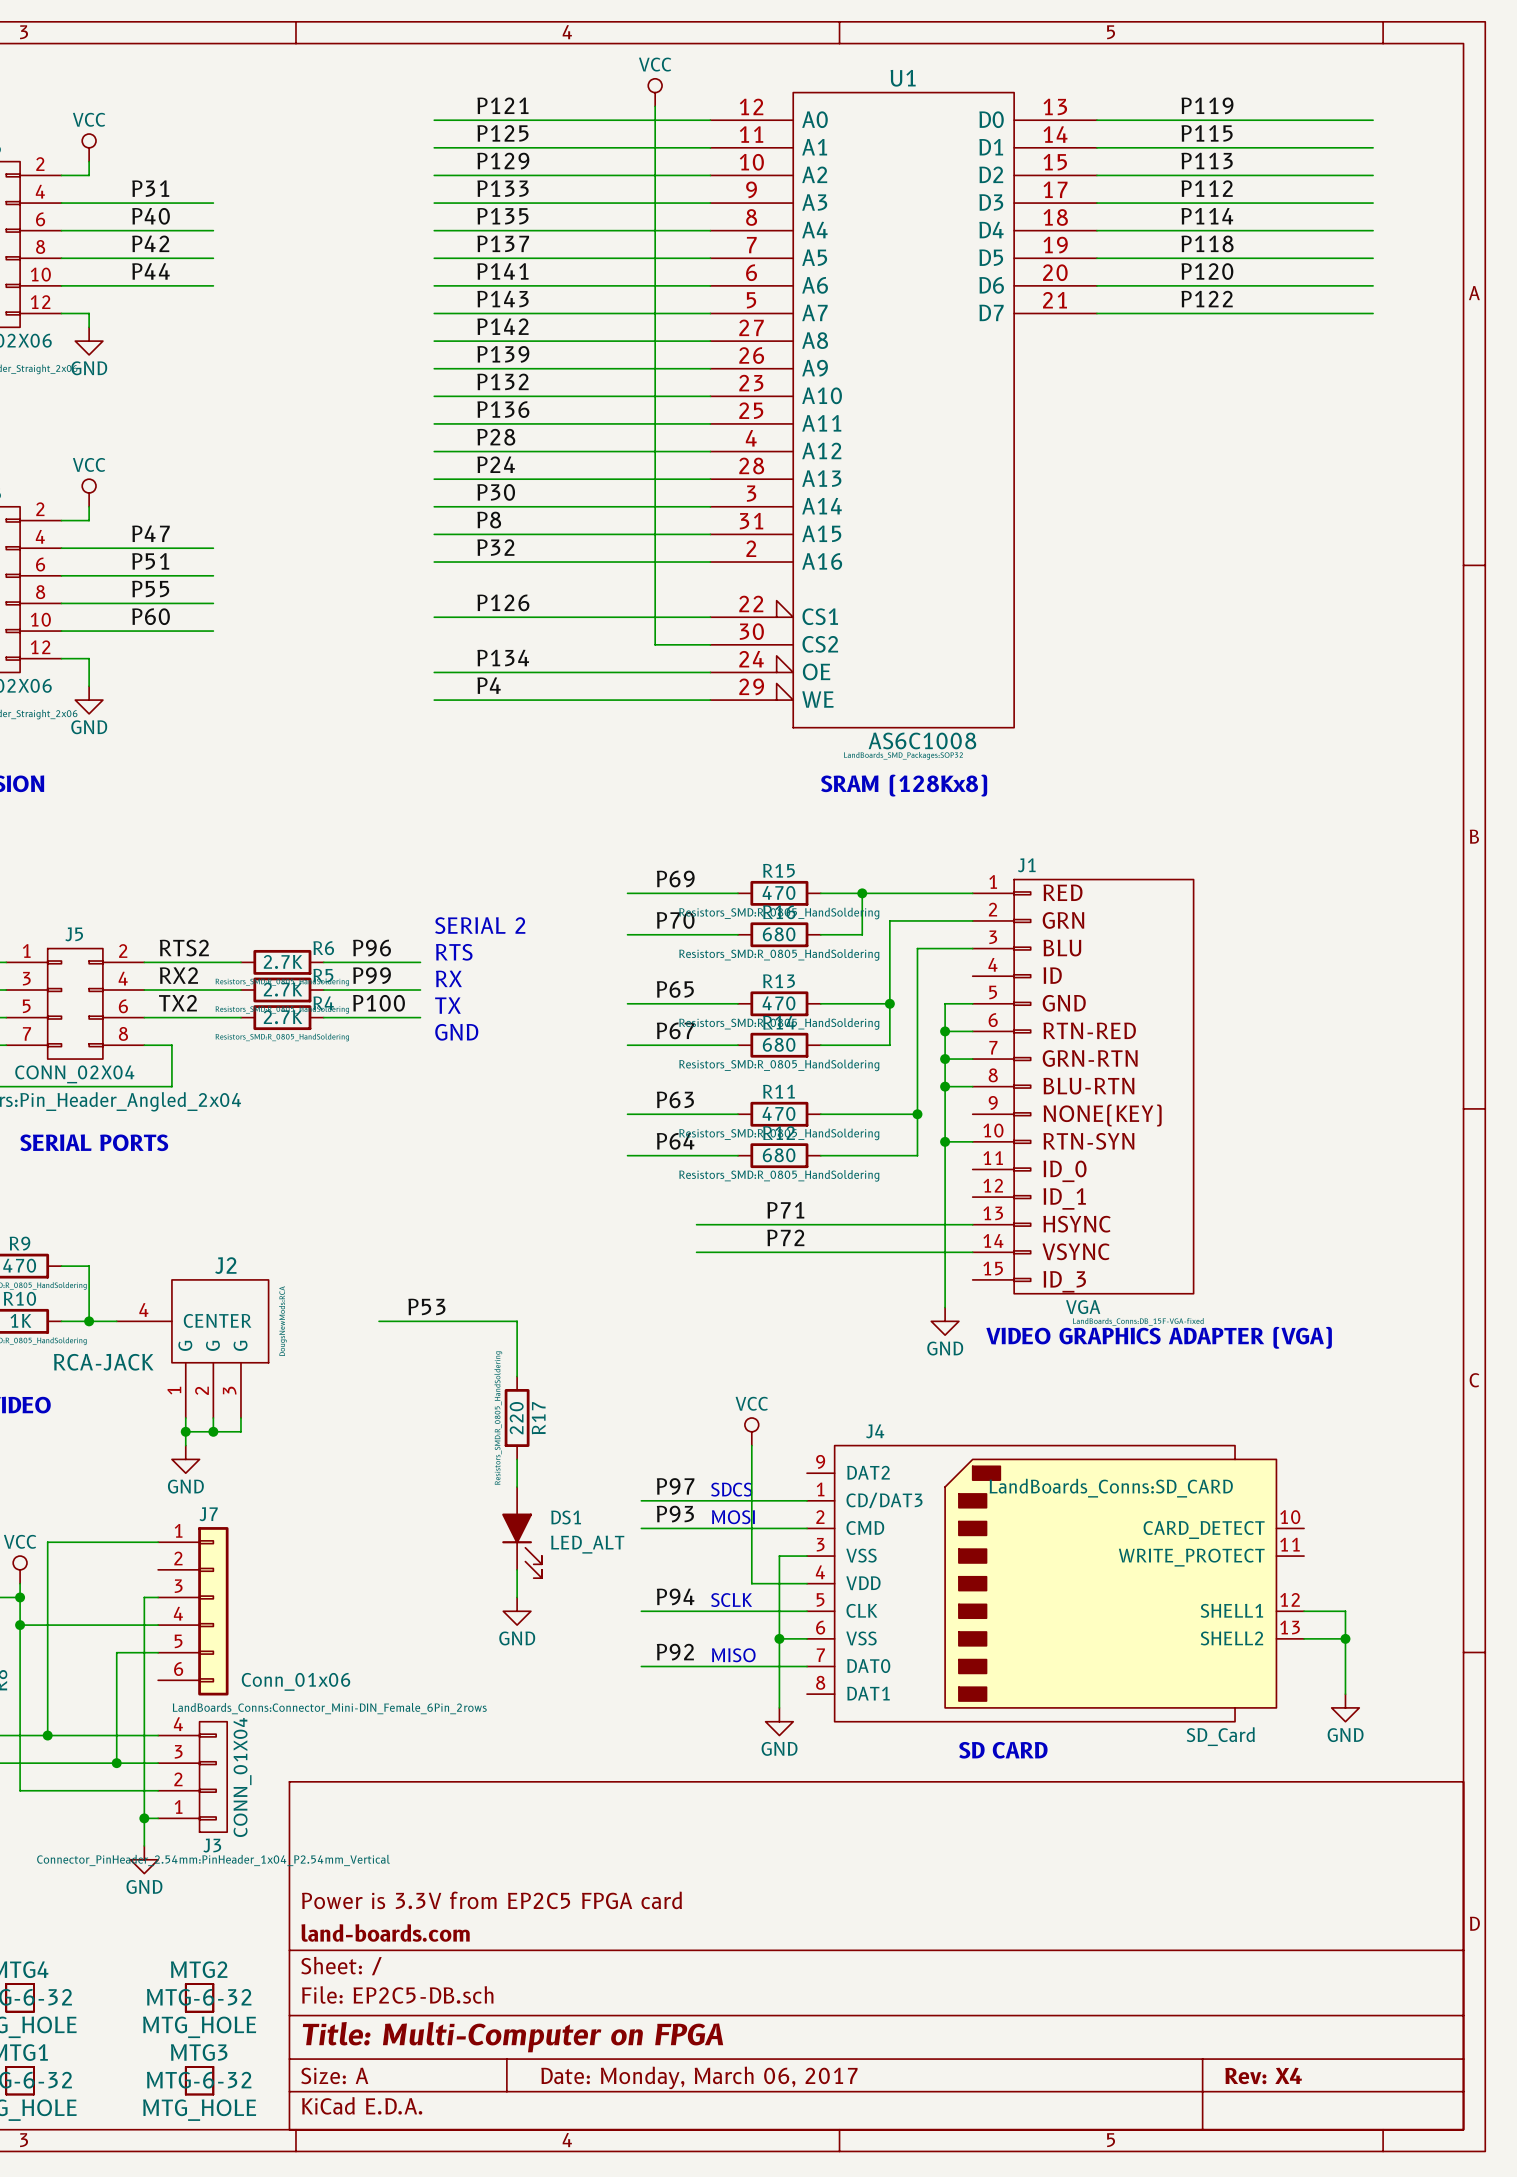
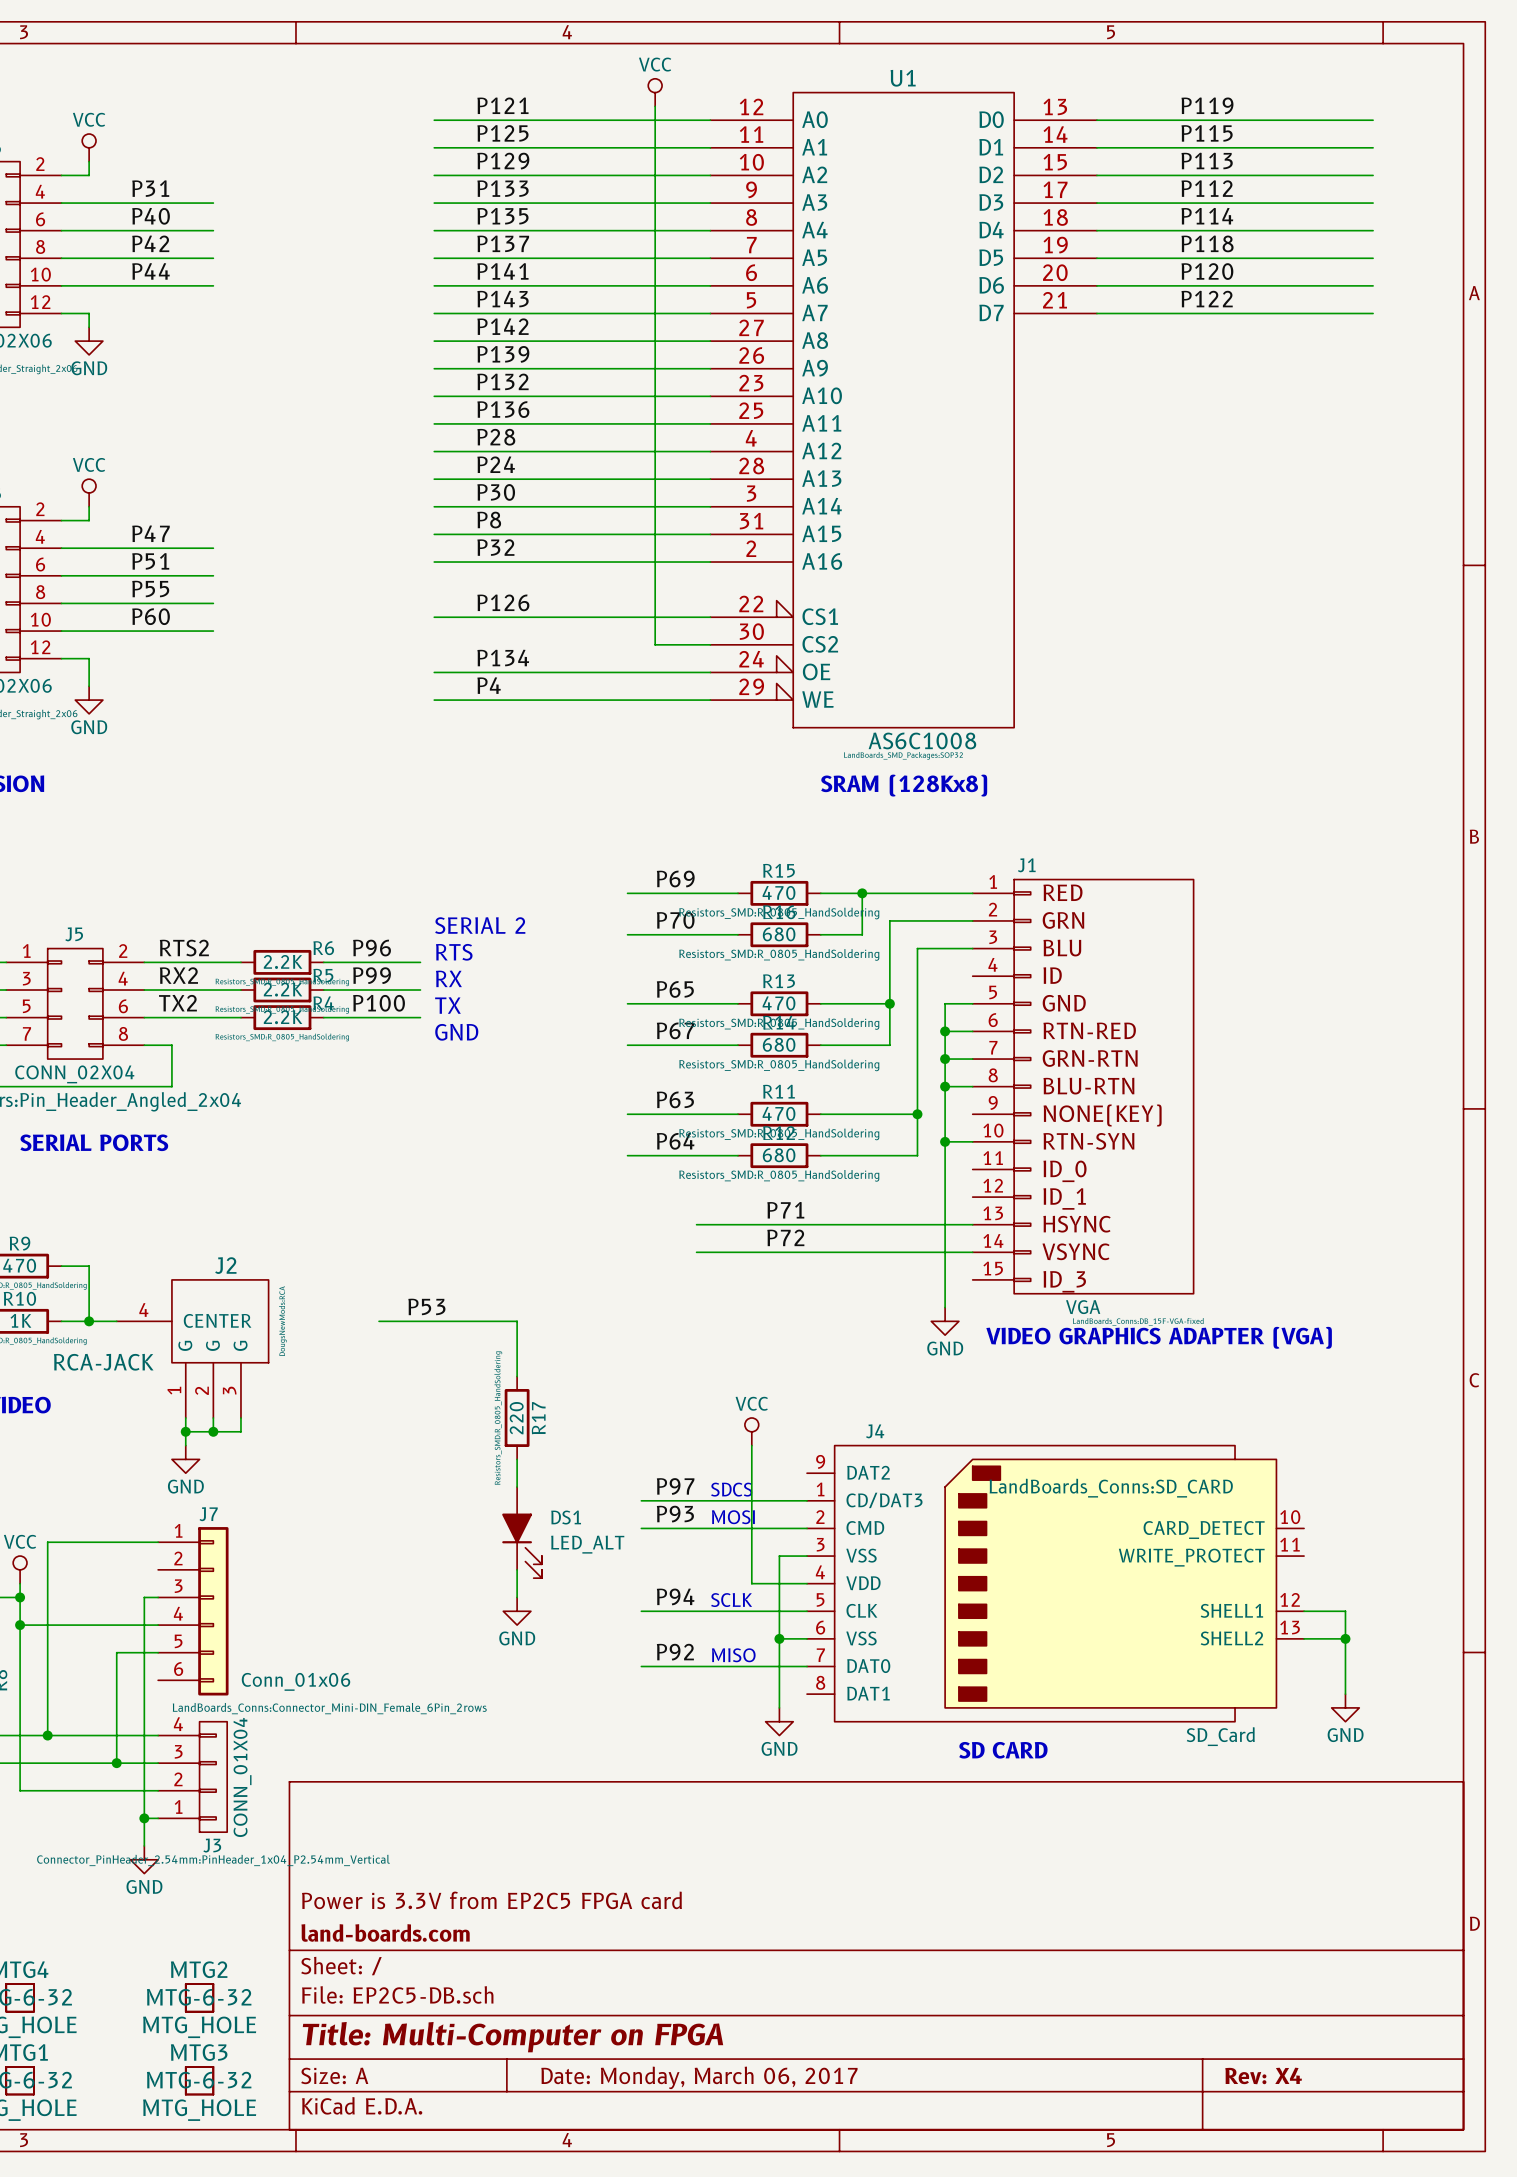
R6 value: 2.7K (283, 961) -> 2.2K (283, 961)
R5 value: 2.7K (283, 989) -> 2.2K (283, 989)
R4 value: 2.7K (283, 1017) -> 2.2K (283, 1017)

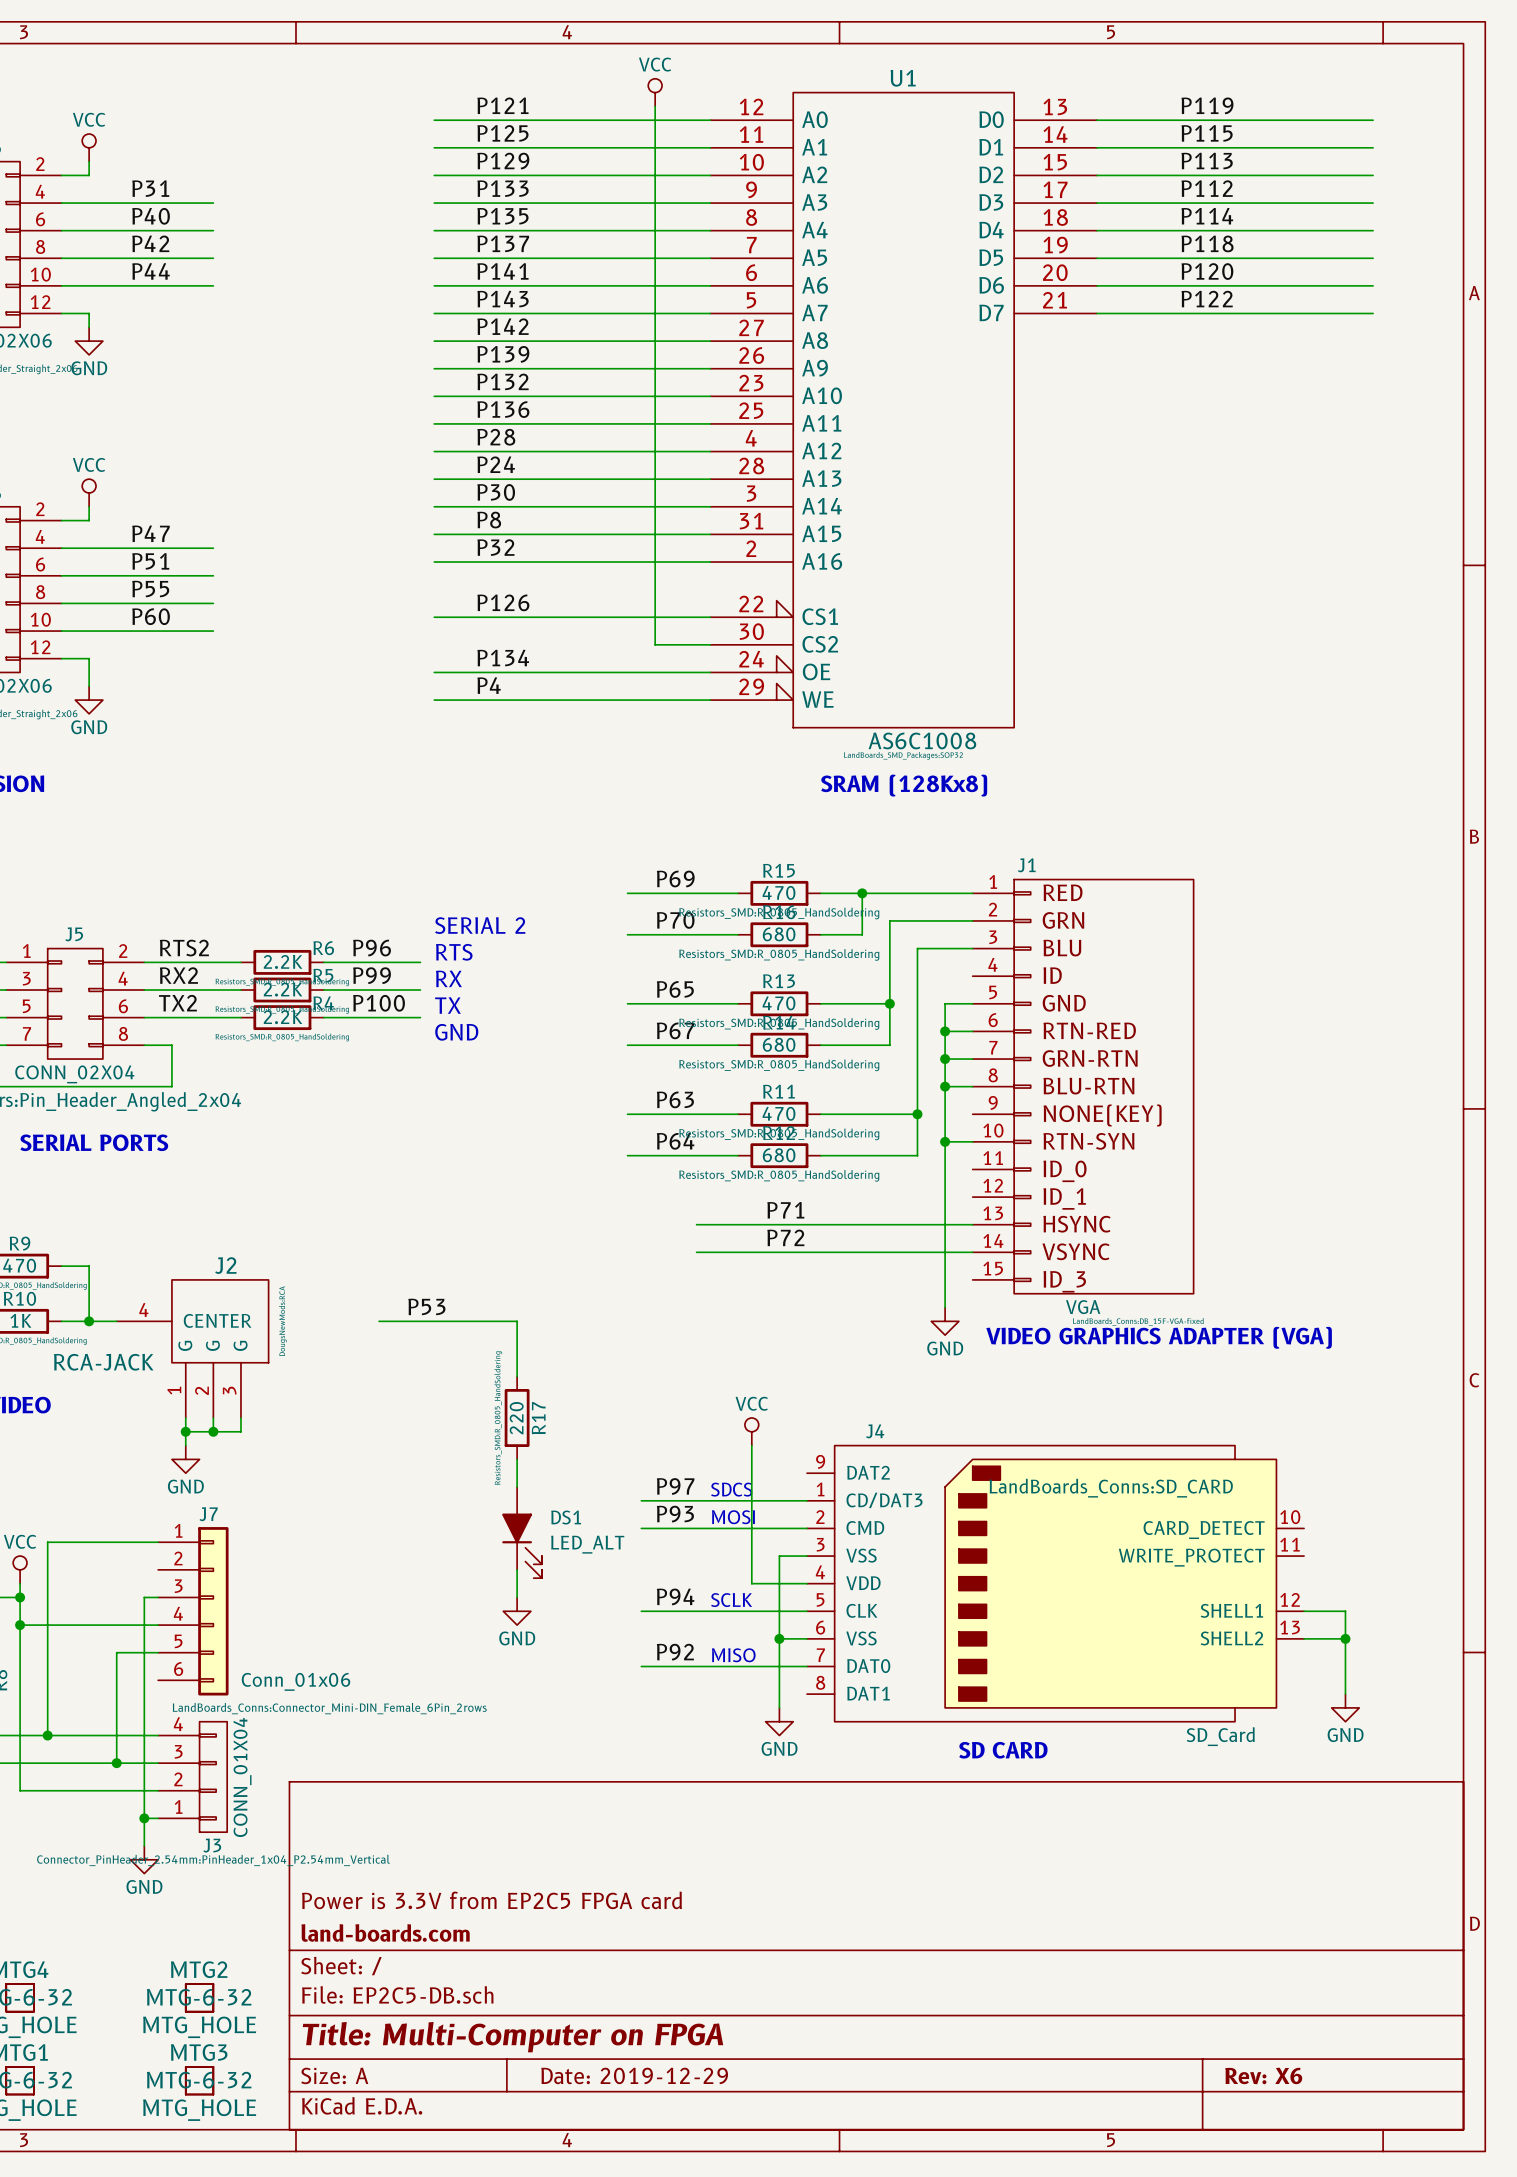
title block: Rev: X4 (1263, 2075) -> Rev: X6 (1263, 2075)
title block: Date: Monday, March 06, 2017 (699, 2077) -> Date: 2019-12-29 (634, 2075)

